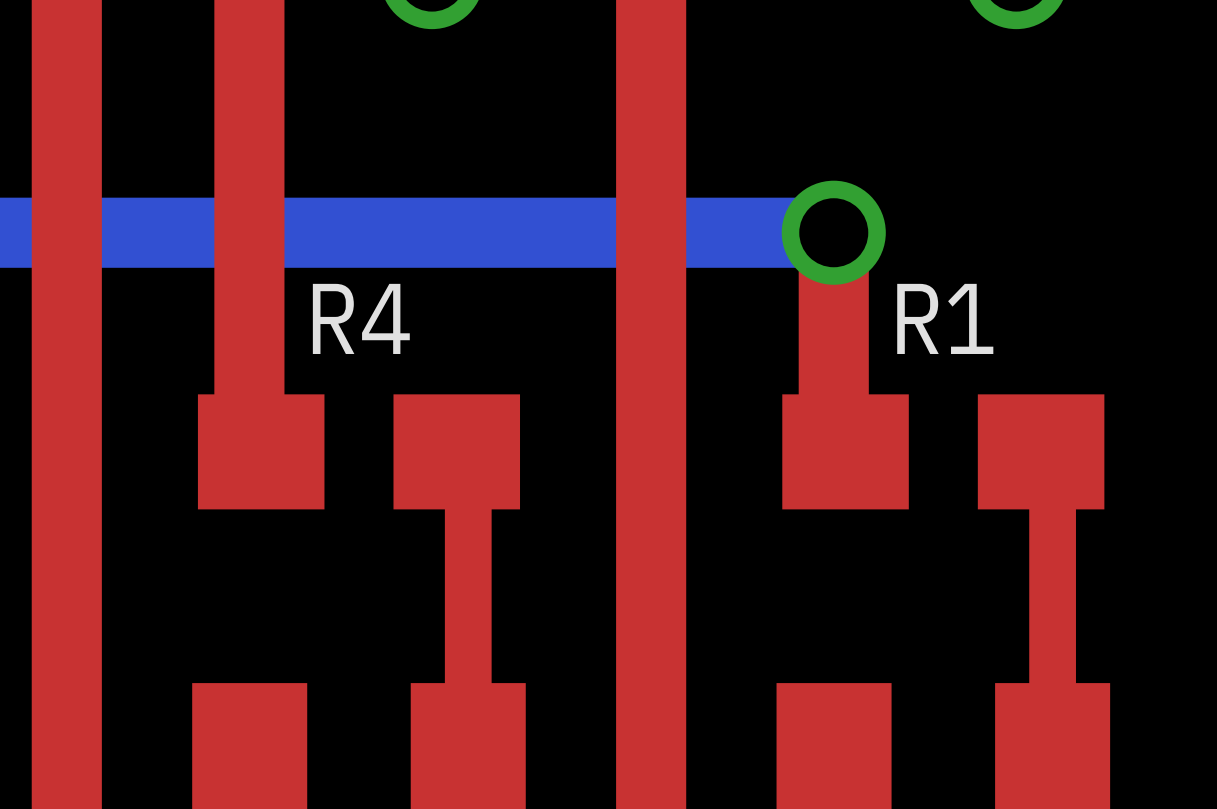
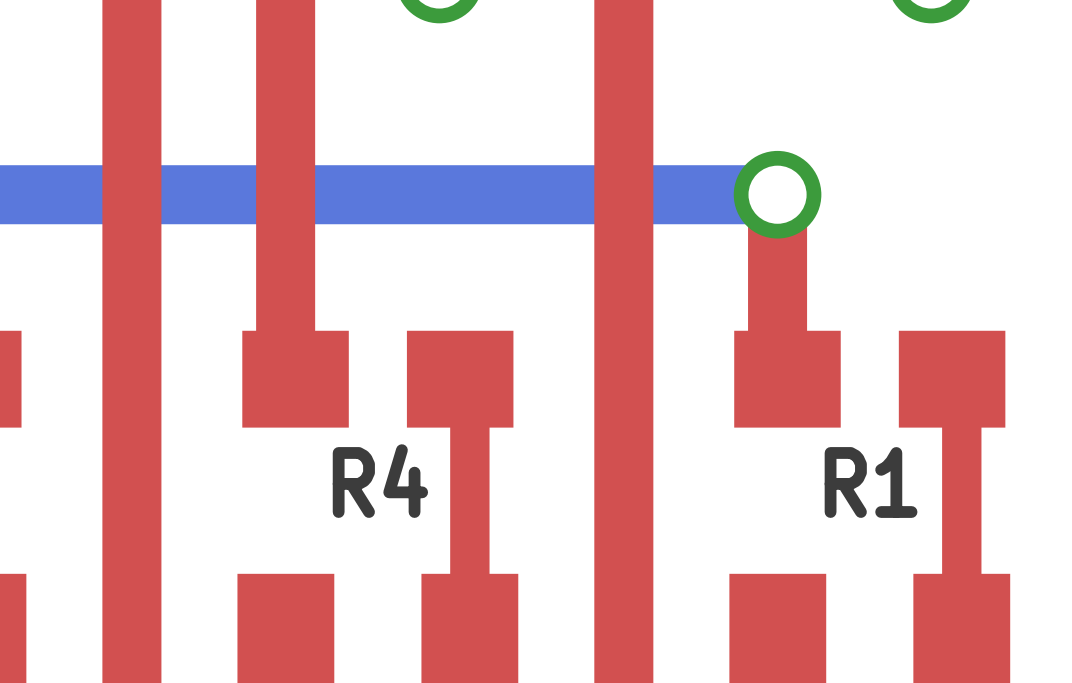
R4 name position: R4 (361, 318) -> R4 (380, 481)
R1 name position: R1 (945, 318) -> R1 (871, 482)

